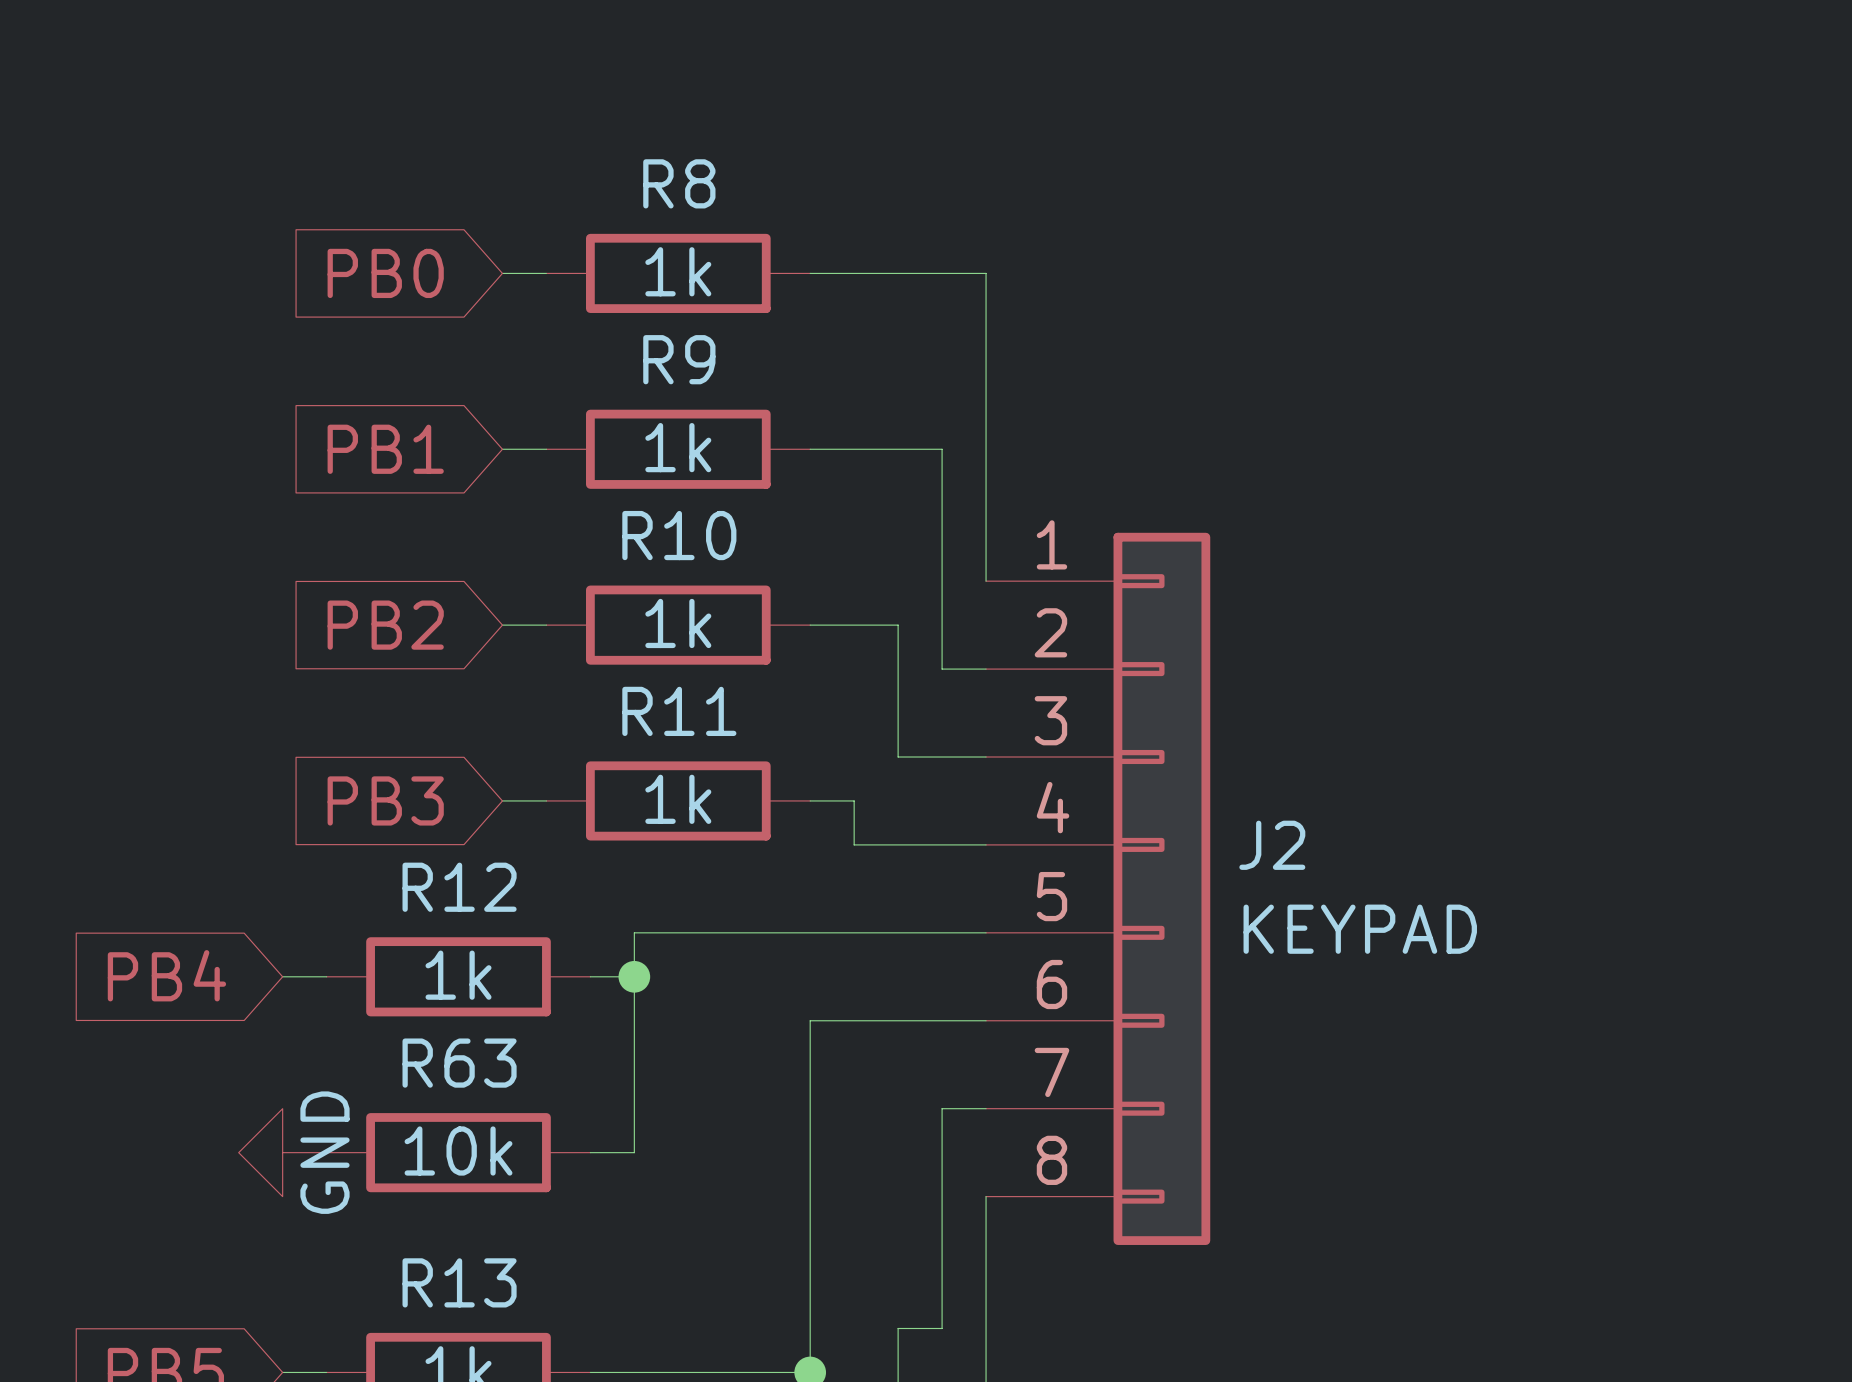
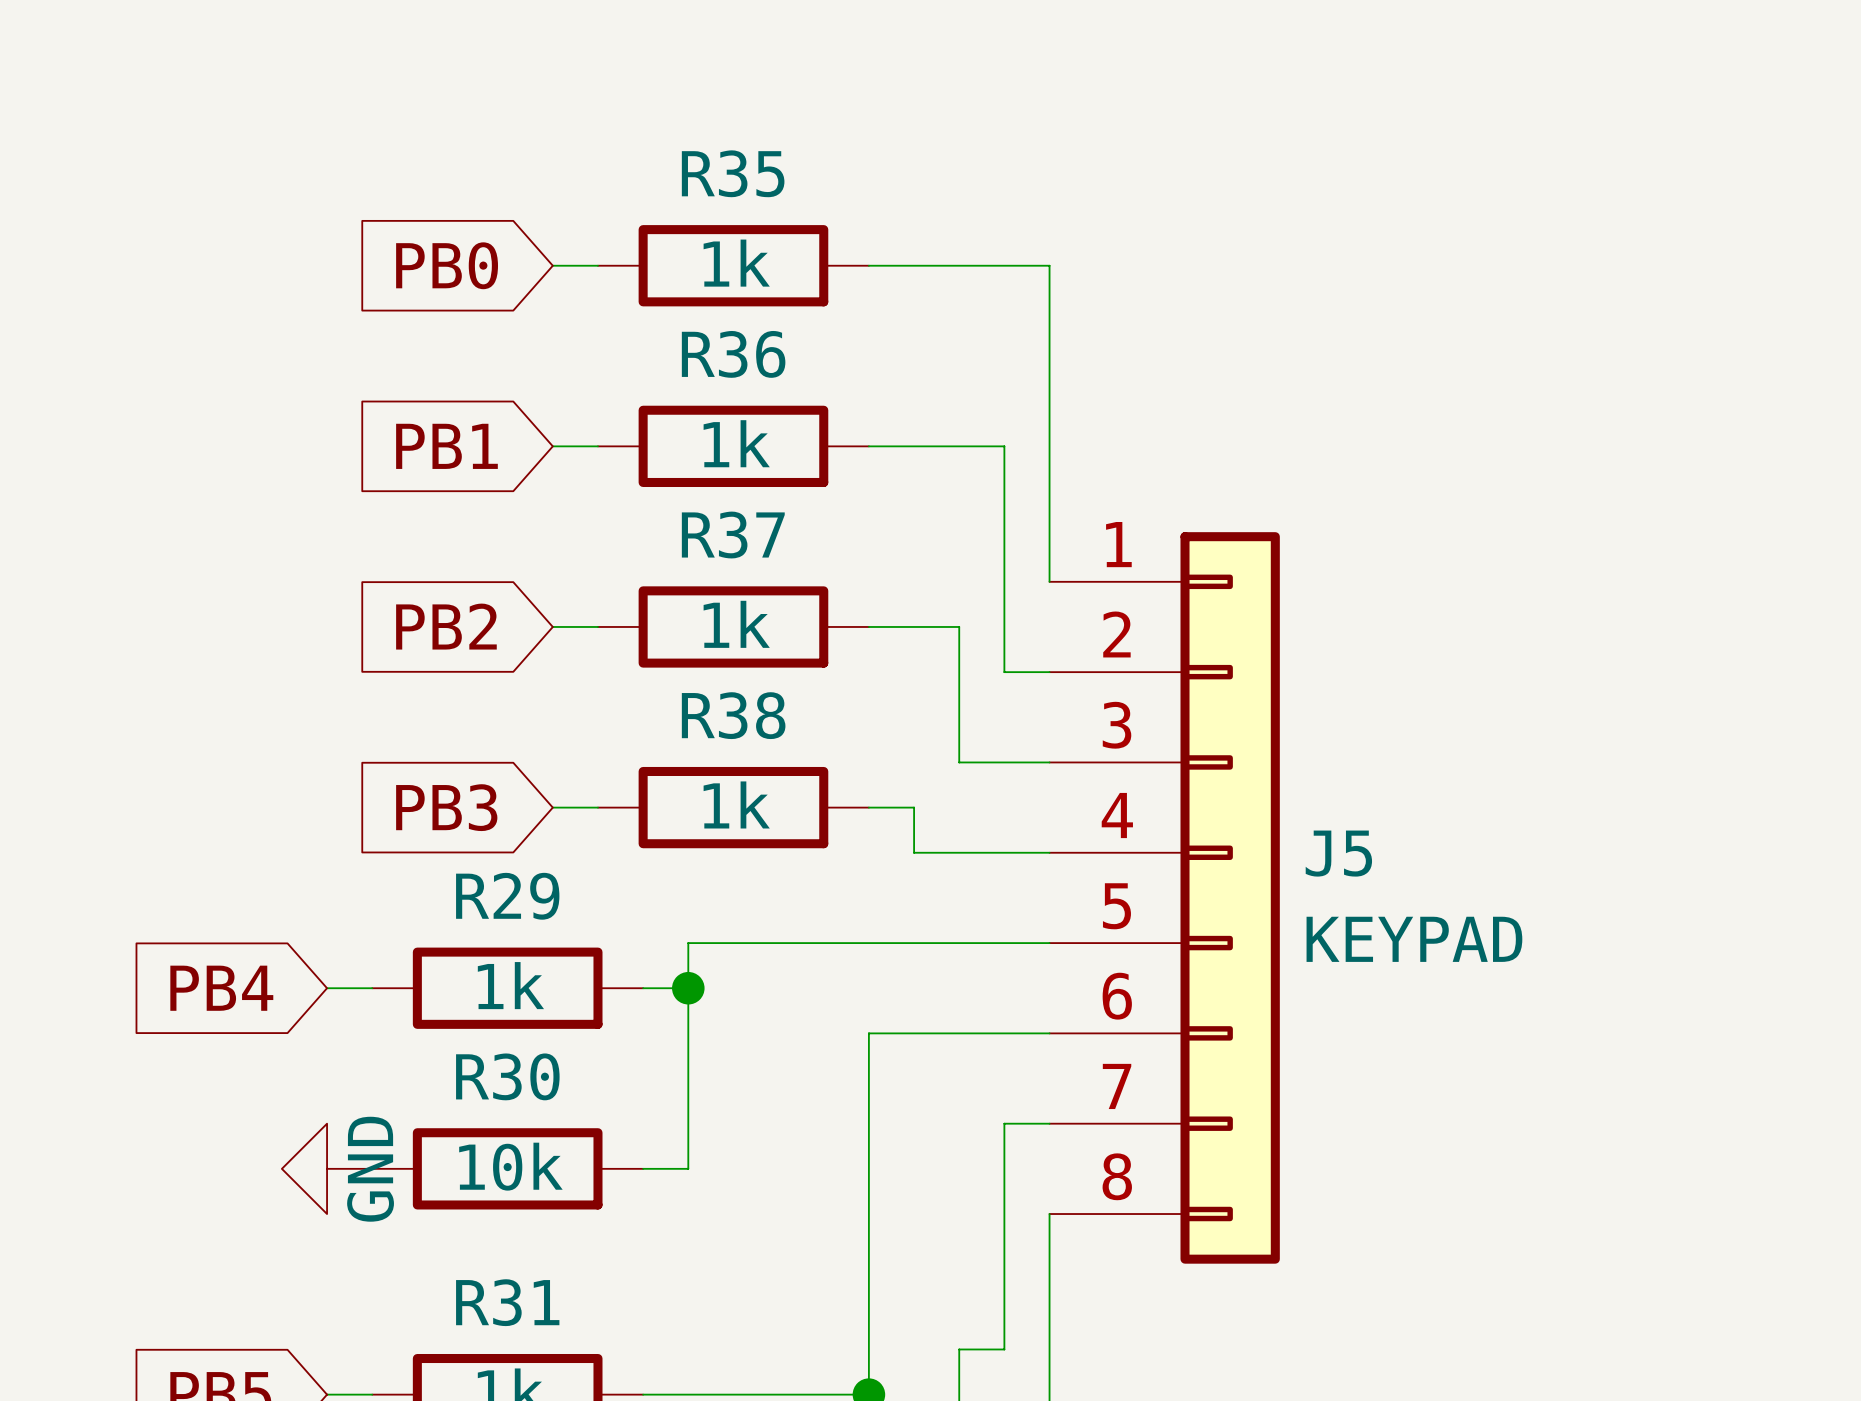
R8 name: R8 (679, 183) -> R35 (733, 173)
R9 name: R9 (679, 359) -> R36 (733, 354)
R10 name: R10 (679, 535) -> R37 (733, 535)
R11 name: R11 (679, 711) -> R38 (733, 715)
J2 name: J2 (1272, 845) -> J5 (1338, 853)
R12 name: R12 (459, 887) -> R29 (507, 896)
R63 name: R63 (459, 1063) -> R30 (507, 1076)
R13 name: R13 (459, 1282) -> R31 (507, 1302)

